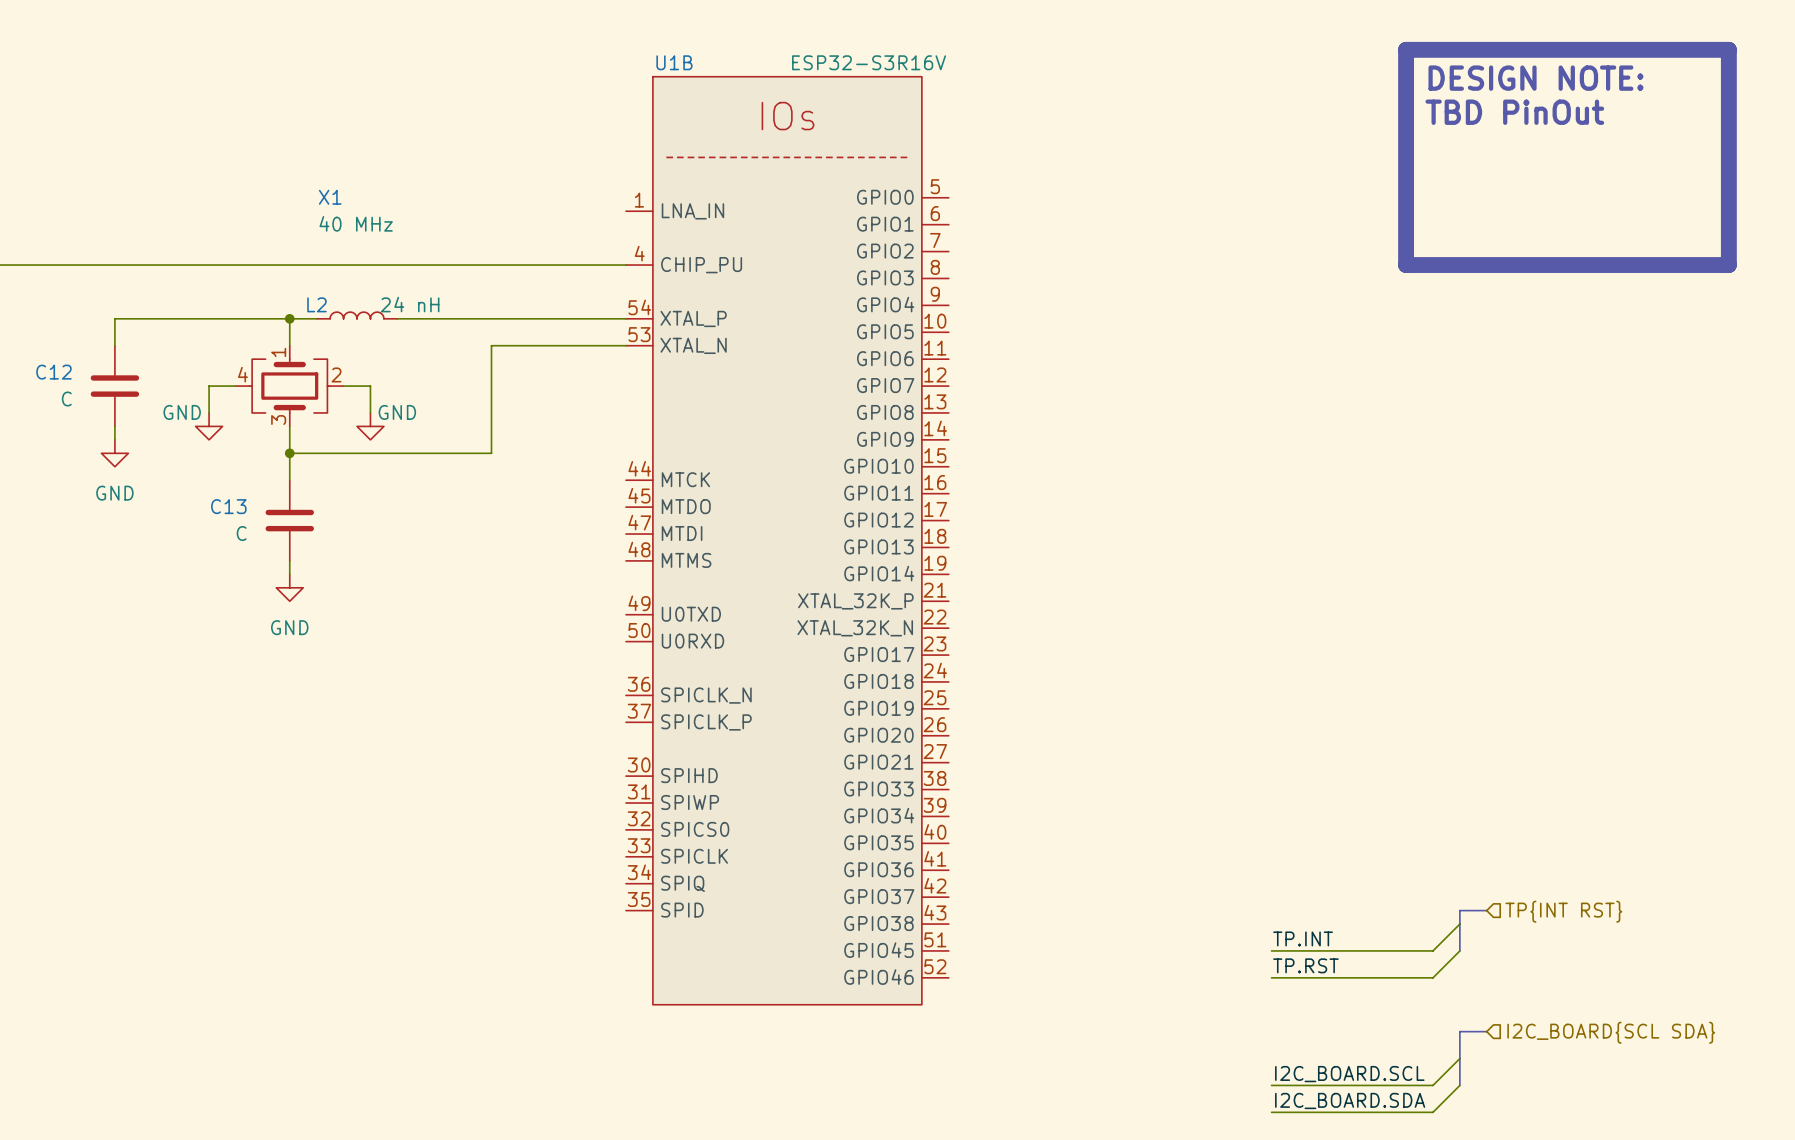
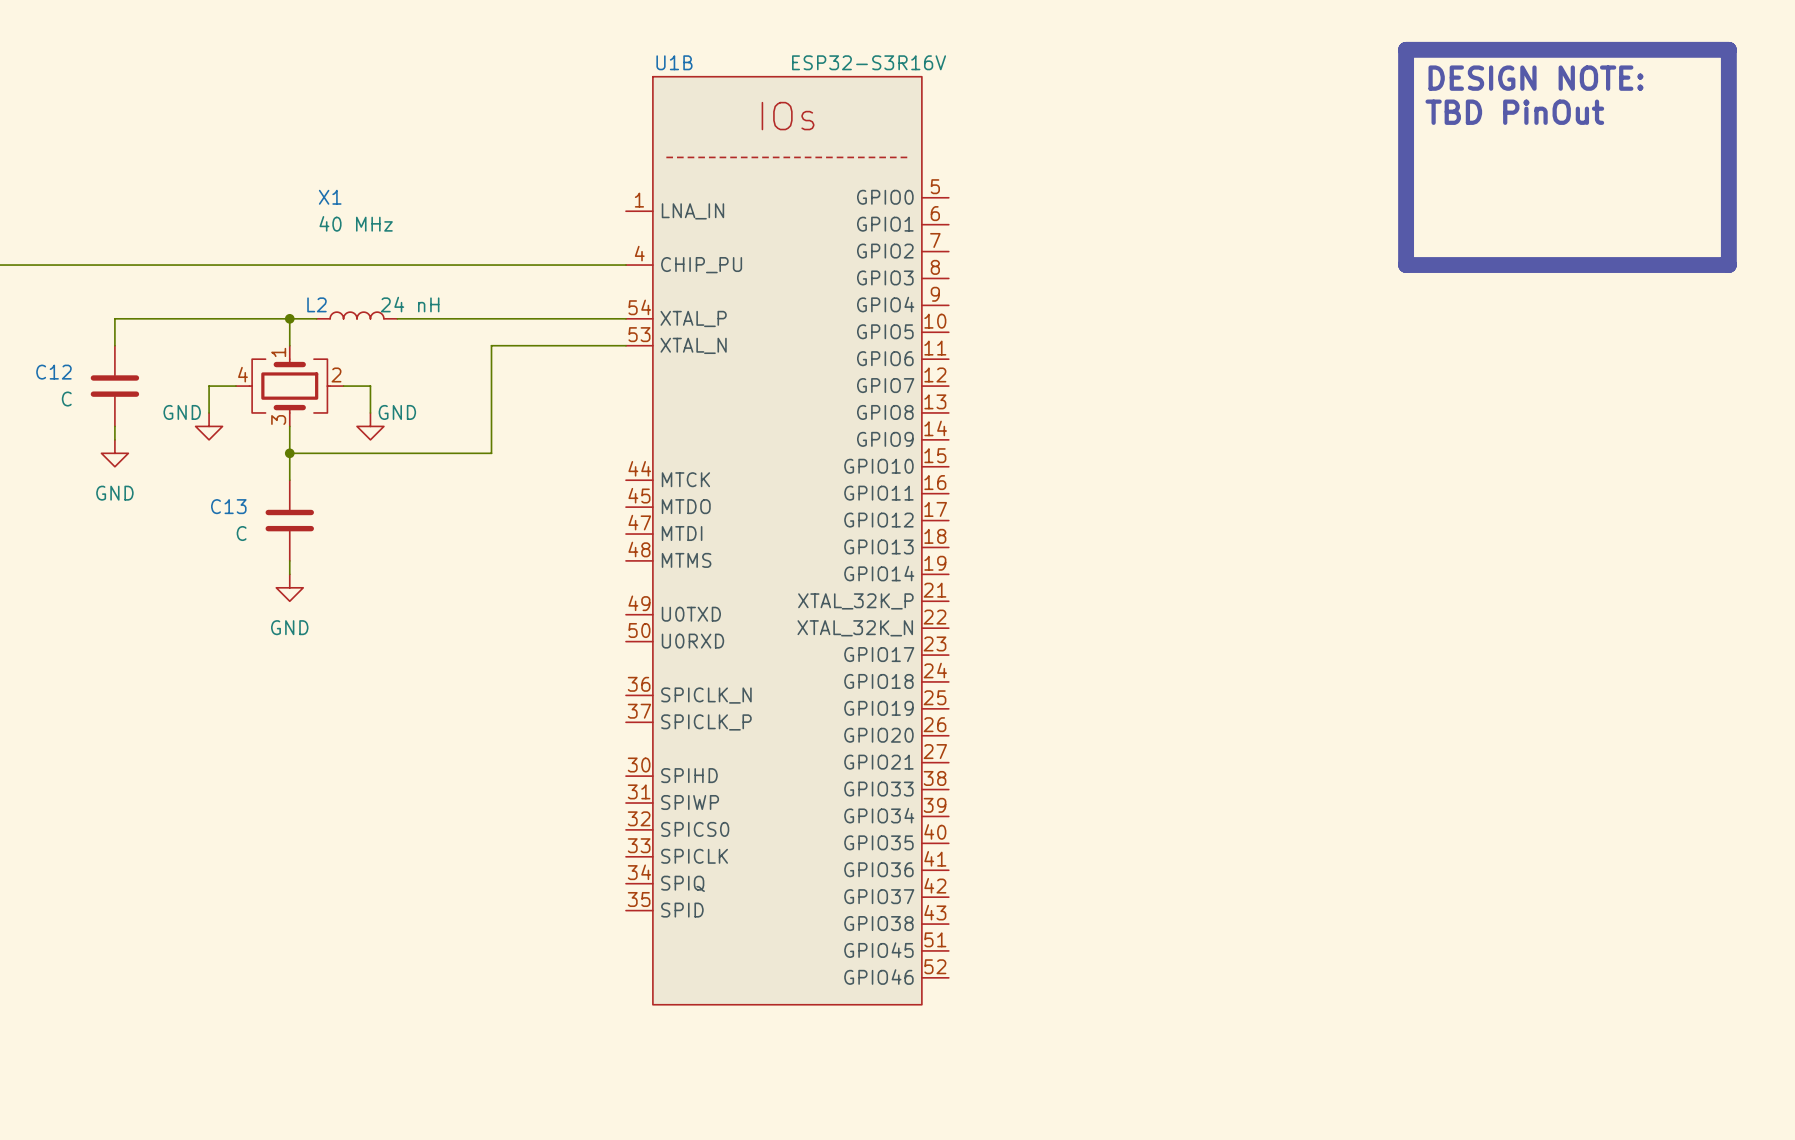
bus: (1486, 910) (1459, 910) (1459, 950) -> none
hierarchical label: TP{INT RST} (1563, 911) -> none
wire: (1459, 924) (1432, 950) (1271, 950) -> none
label: TP.INT (1303, 938) -> none
wire: (1459, 950) (1432, 977) (1271, 977) -> none
label: TP.RST (1305, 965) -> none
bus: (1486, 1031) (1459, 1031) (1459, 1085) -> none
hierarchical label: I2C_BOARD{SCL SDA} (1611, 1032) -> none
wire: (1459, 1058) (1432, 1085) (1271, 1085) -> none
label: I2C_BOARD.SCL (1349, 1074) -> none
wire: (1459, 1085) (1432, 1112) (1271, 1112) -> none
label: I2C_BOARD.SDA (1350, 1100) -> none

